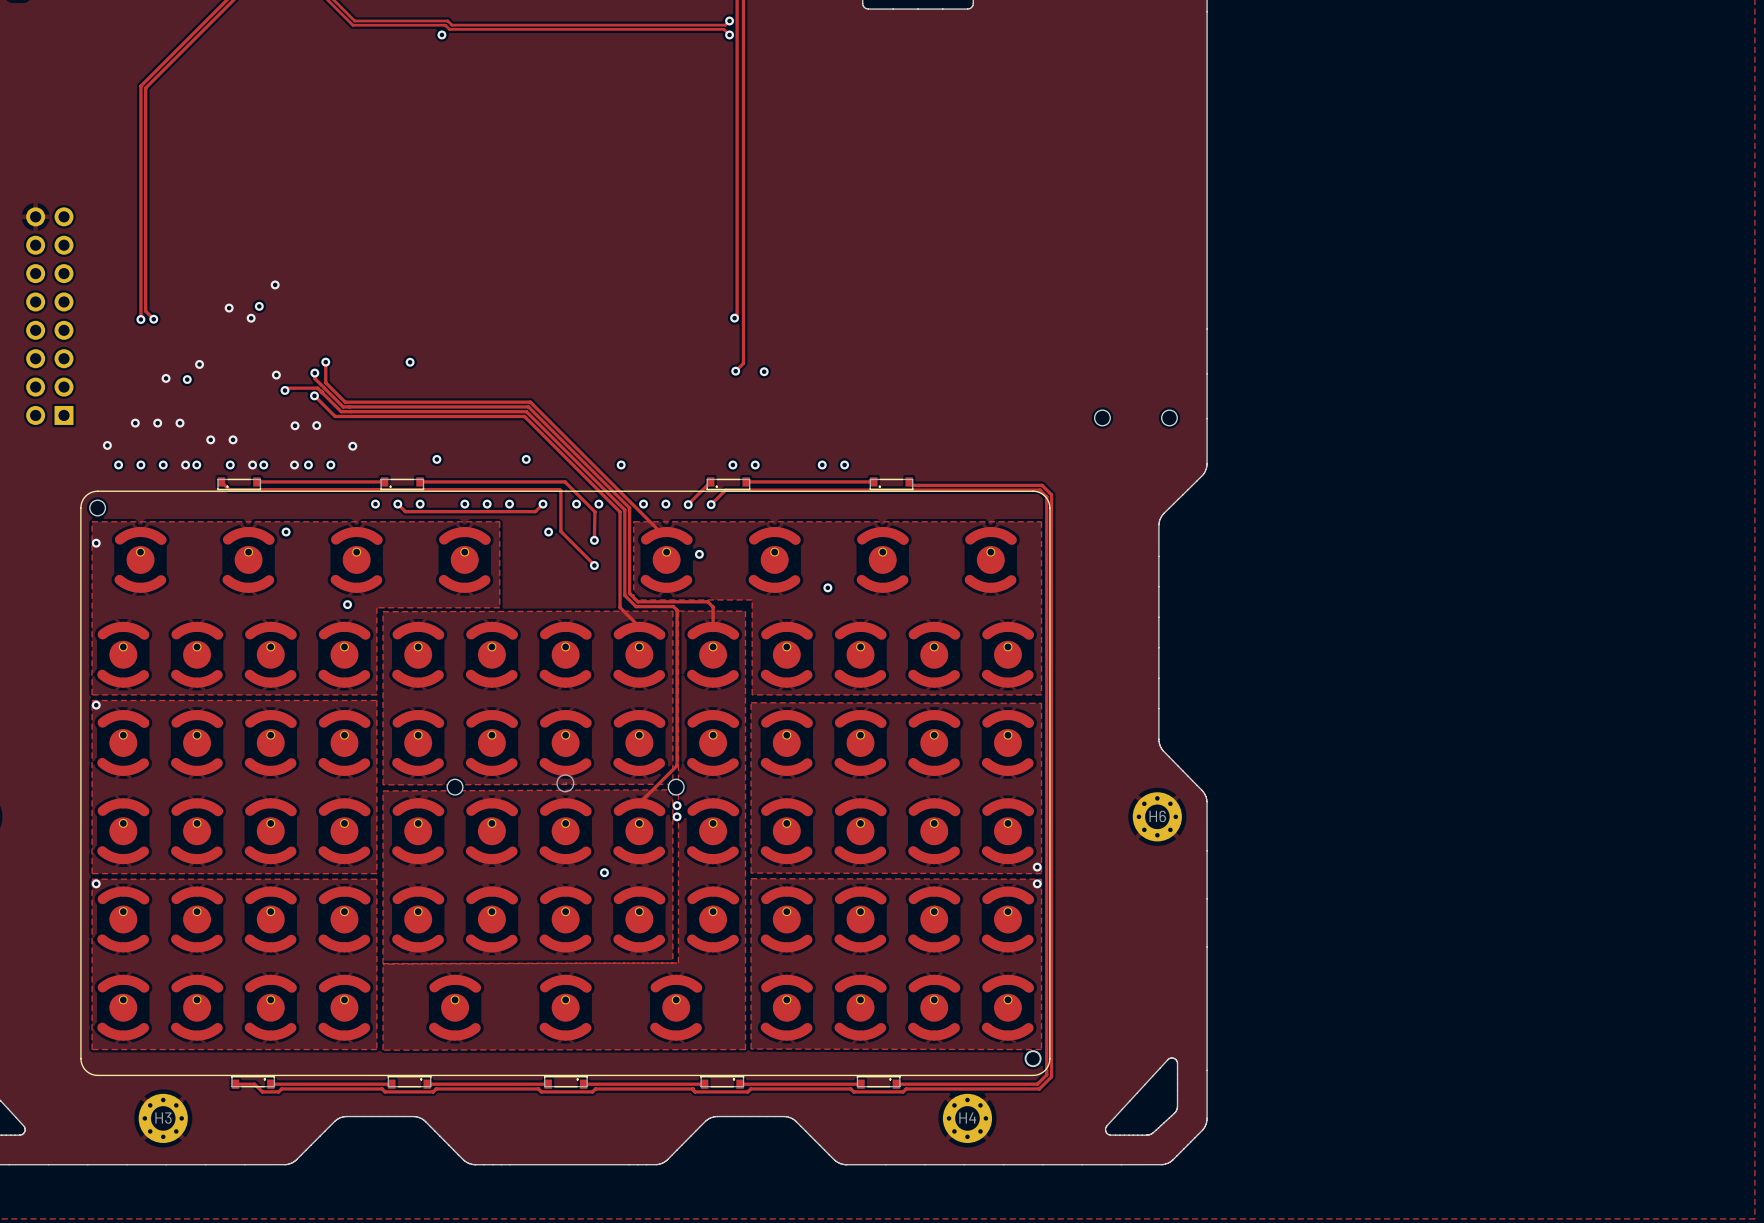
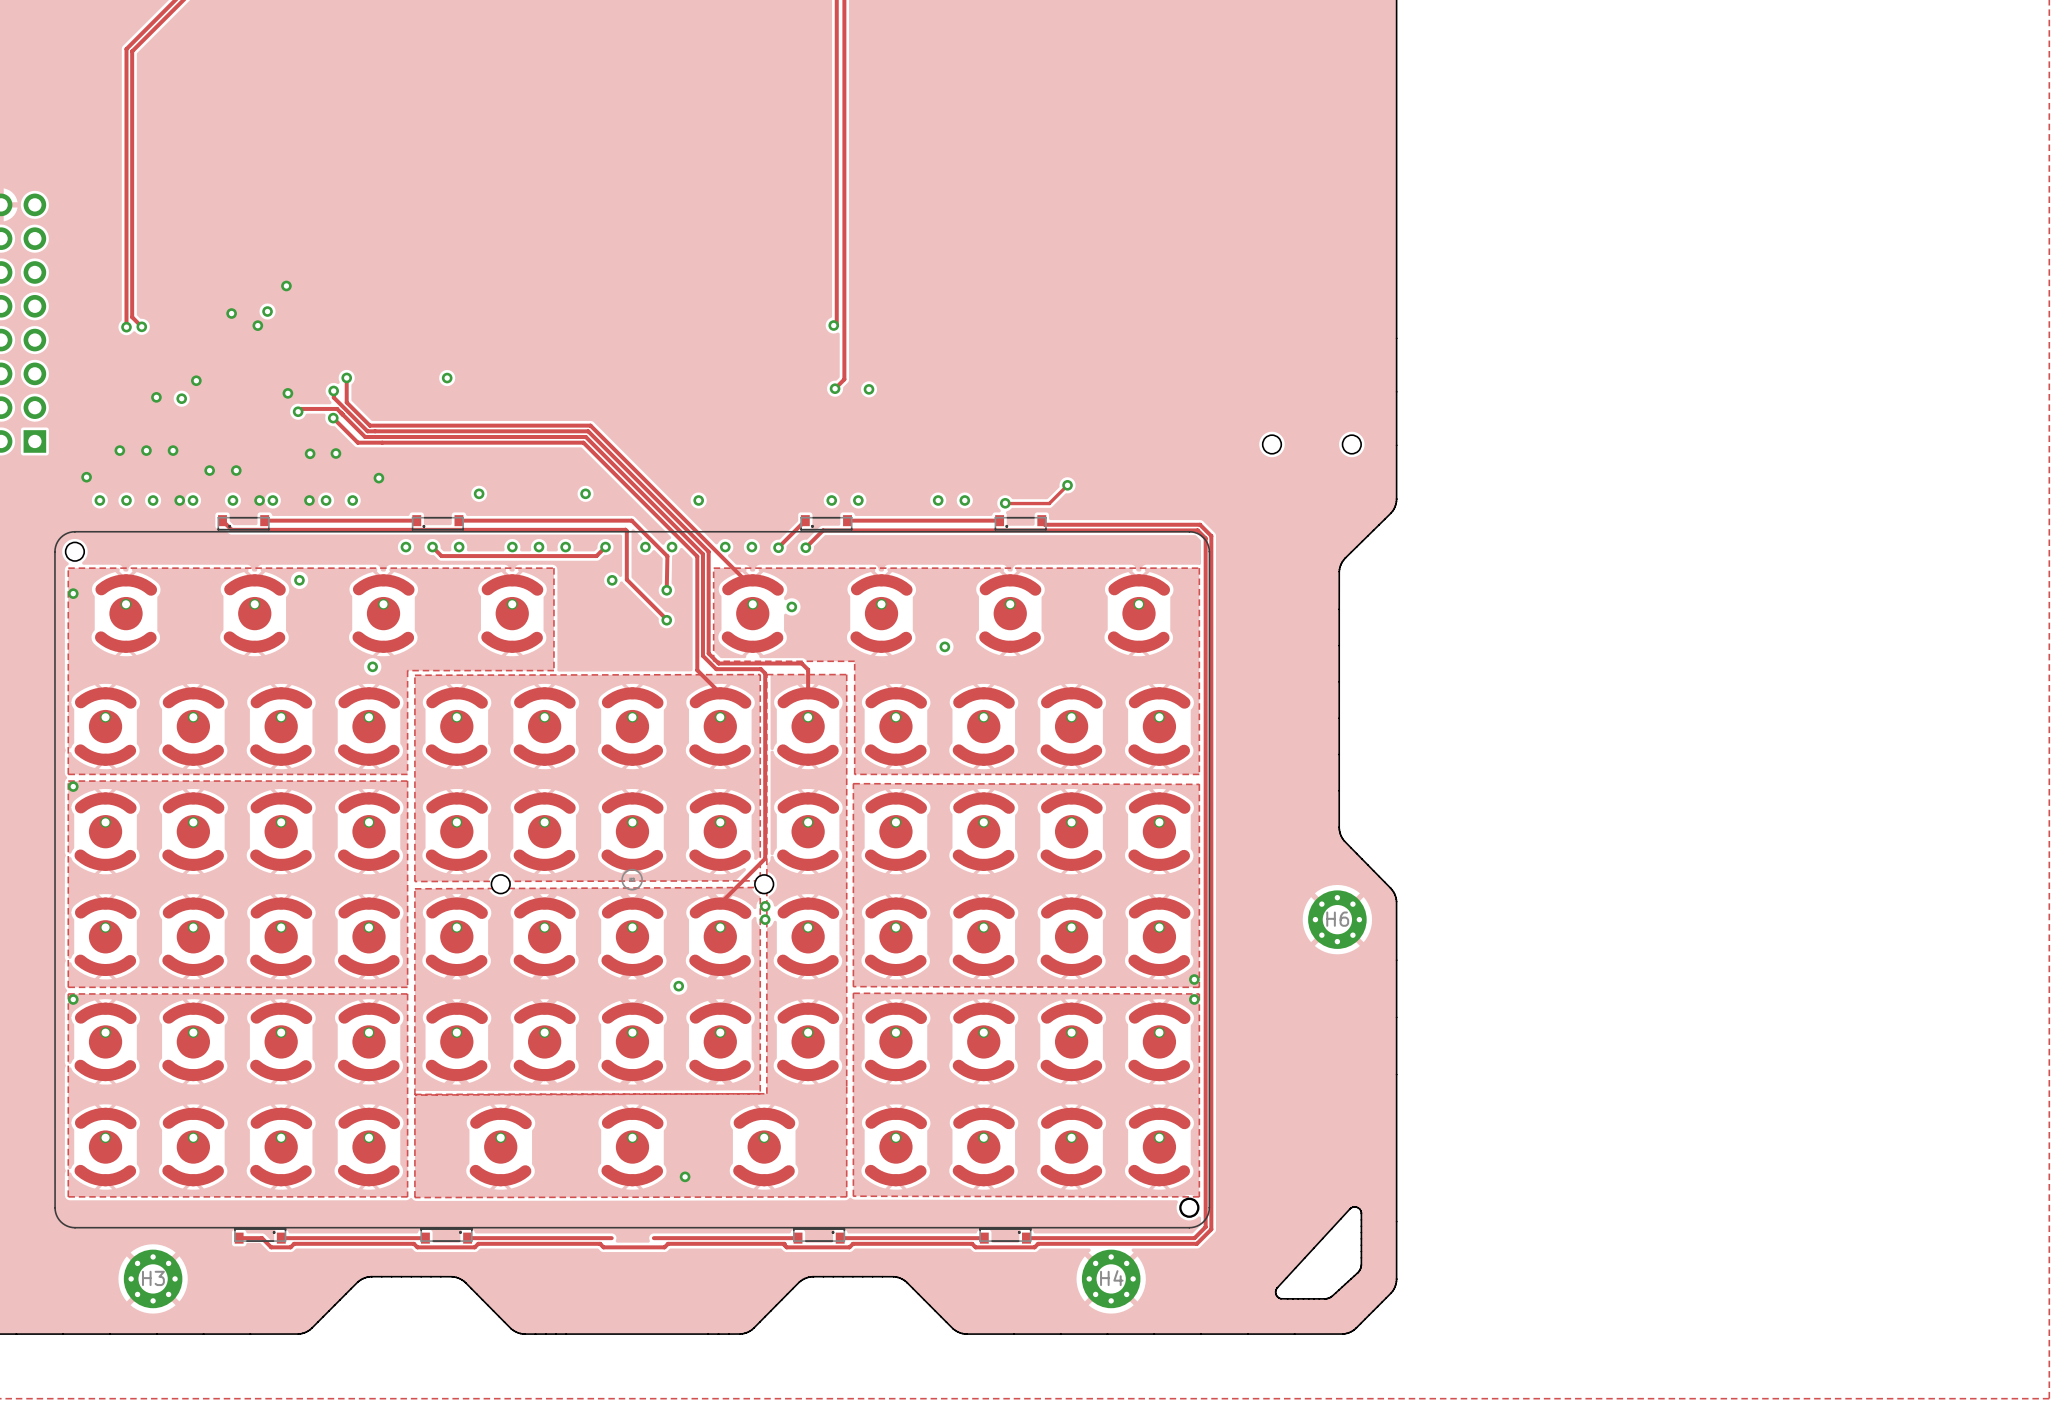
track: none -> (1067, 485) (1049, 503) (1004, 503)
via: none -> (1067, 485)
via: none -> (1005, 503)
via: none -> (685, 1176)
part: (565, 1082) -> none

